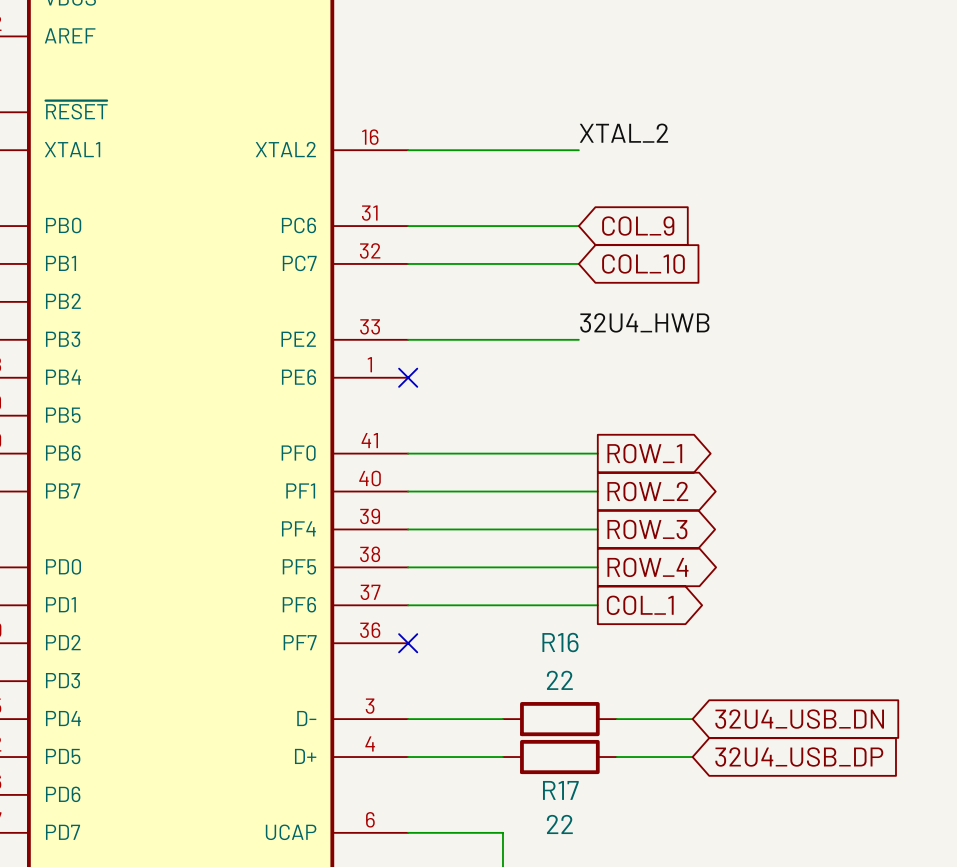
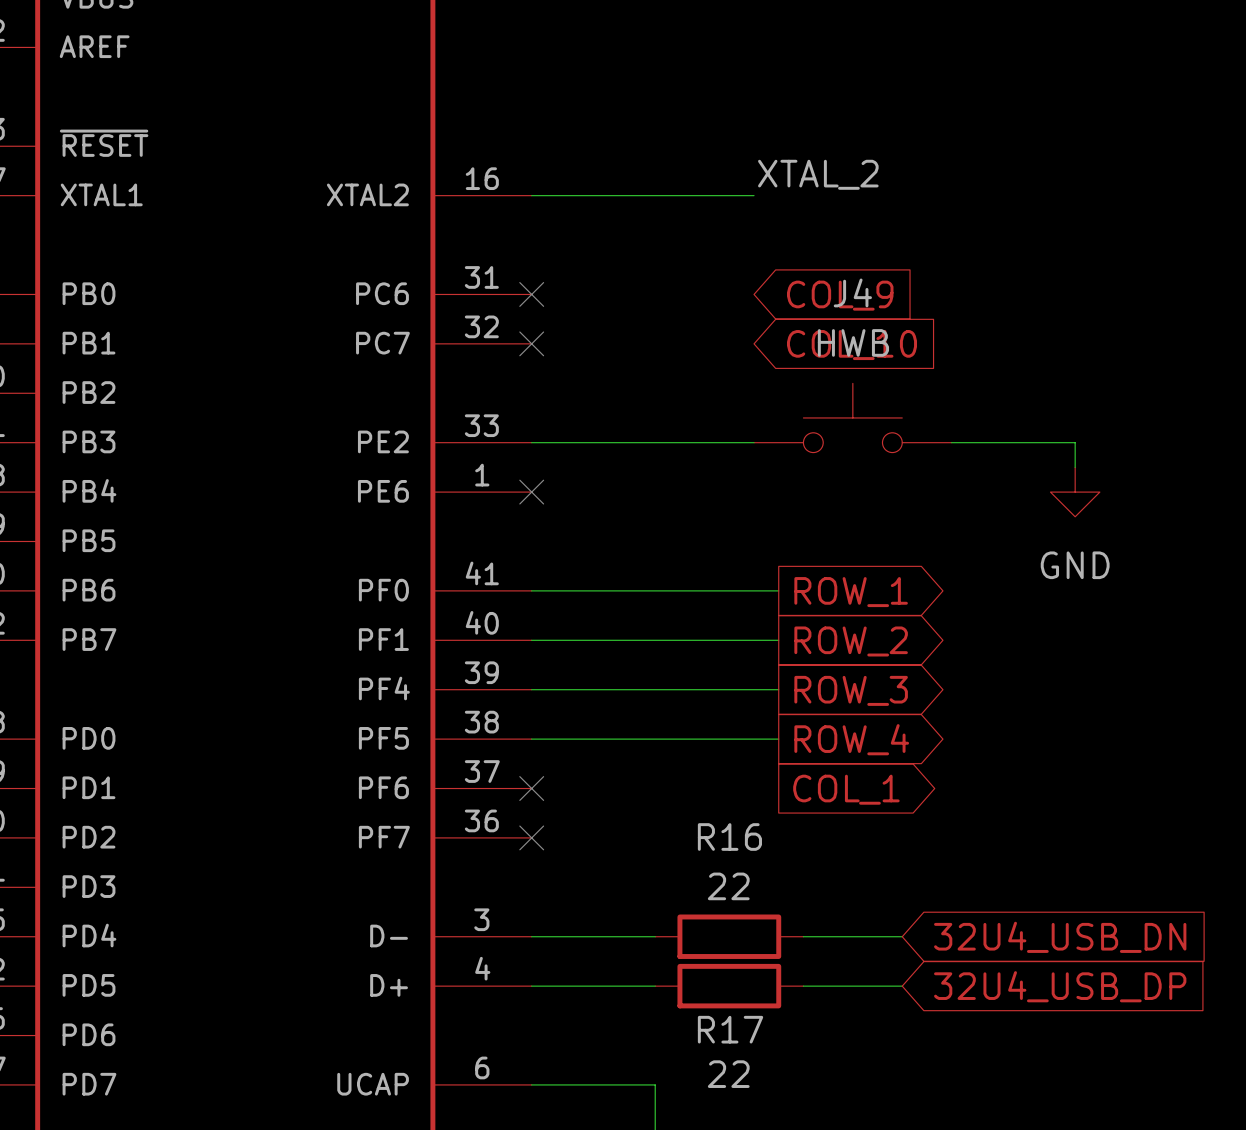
wire: (408, 226) (578, 226) -> none
no-connect mark: none -> (531, 294)
wire: (408, 263) (578, 263) -> none
no-connect mark: none -> (531, 343)
J4: none -> HWB (852, 417)
label: 32U4_HWB (644, 322) -> none
wire: none -> (951, 442) (1075, 442) (1075, 467)
power symbol: none -> GND (1075, 492)
wire: (408, 605) (597, 605) -> none
no-connect mark: none -> (531, 788)

